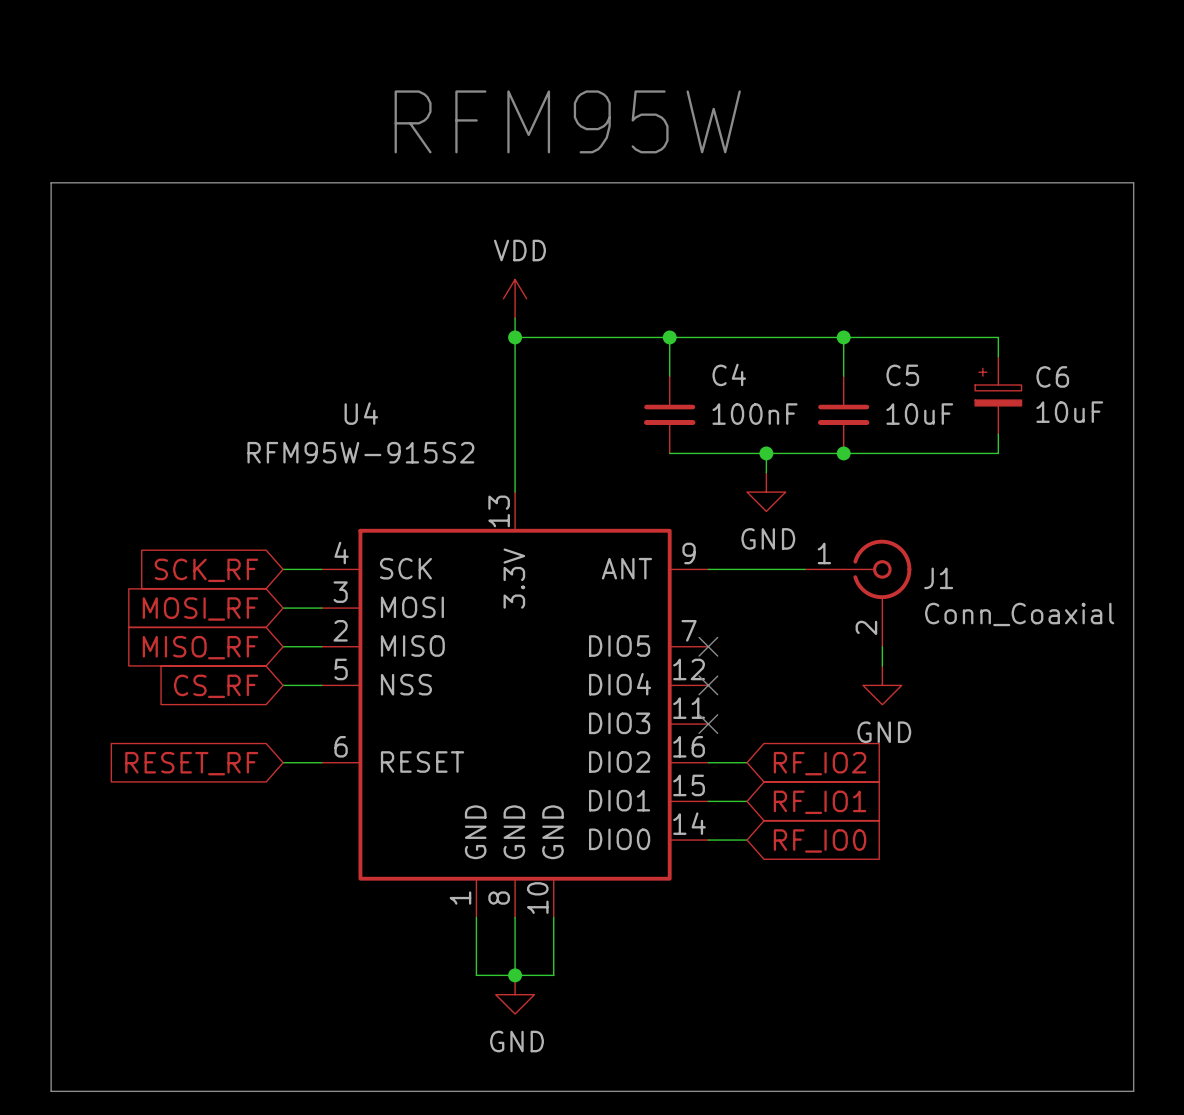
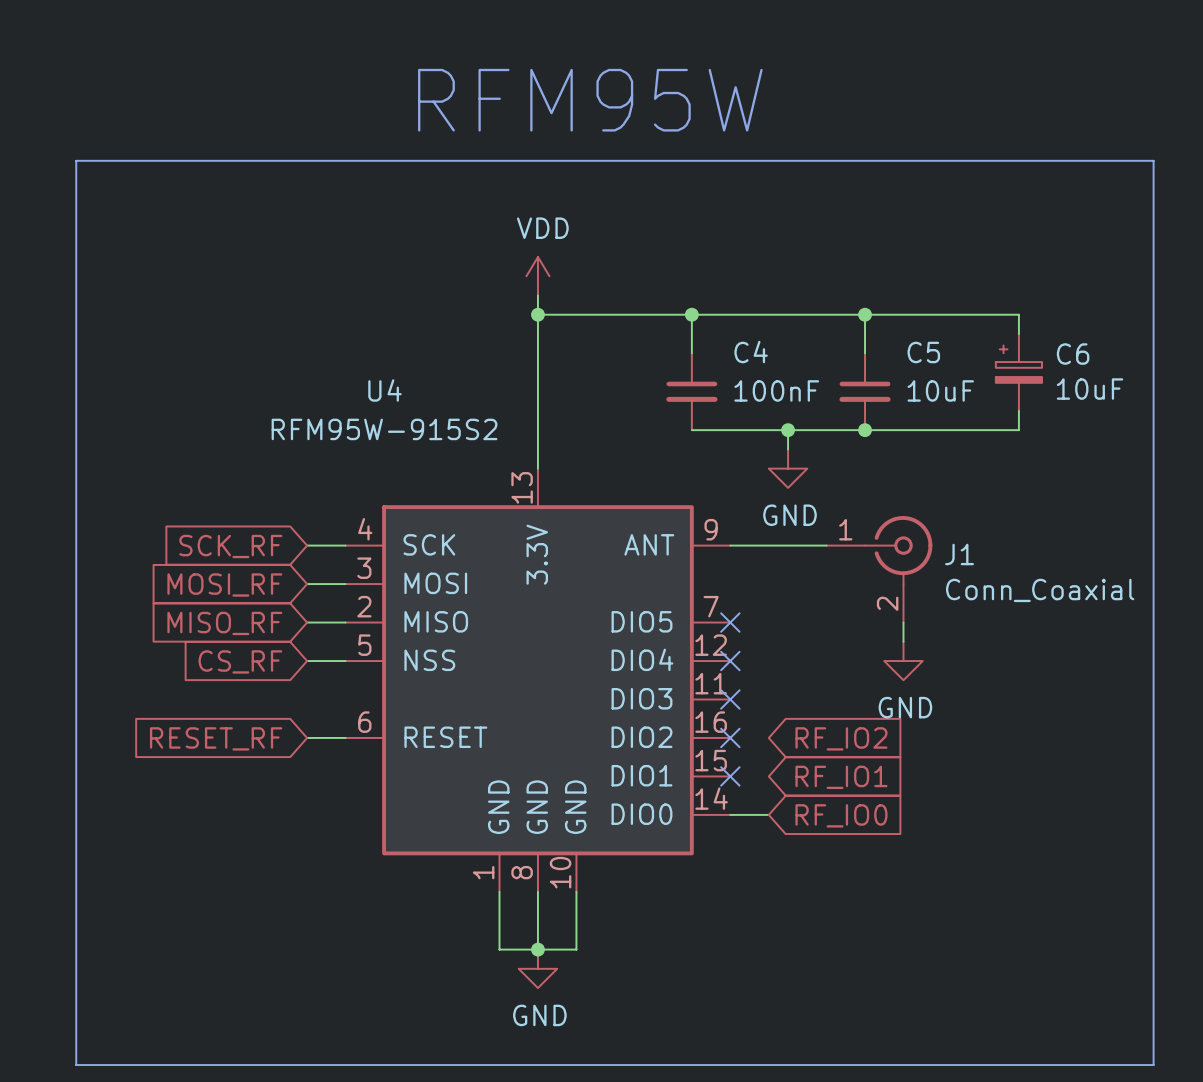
wire: (708, 762) (747, 762) -> none
no-connect mark: none -> (730, 737)
wire: (708, 801) (747, 801) -> none
no-connect mark: none -> (730, 776)

